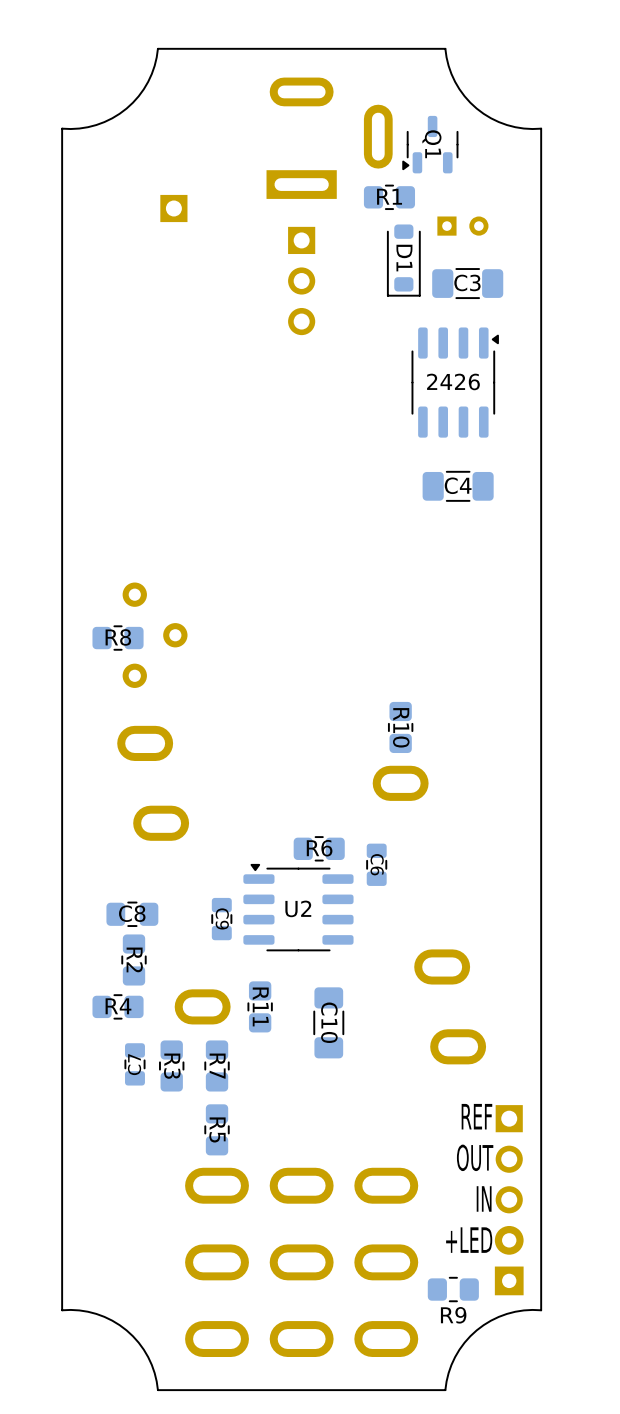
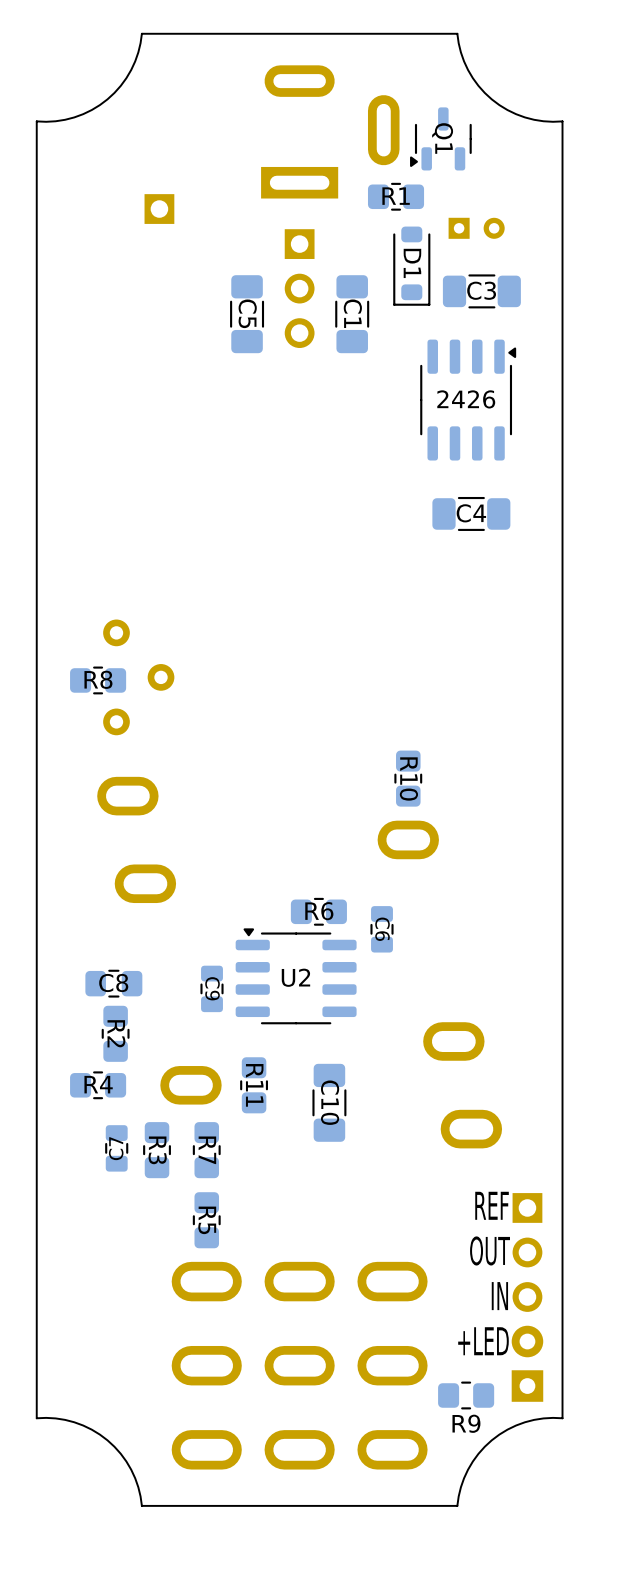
C5: none -> (247, 314)
C1: none -> (352, 314)

